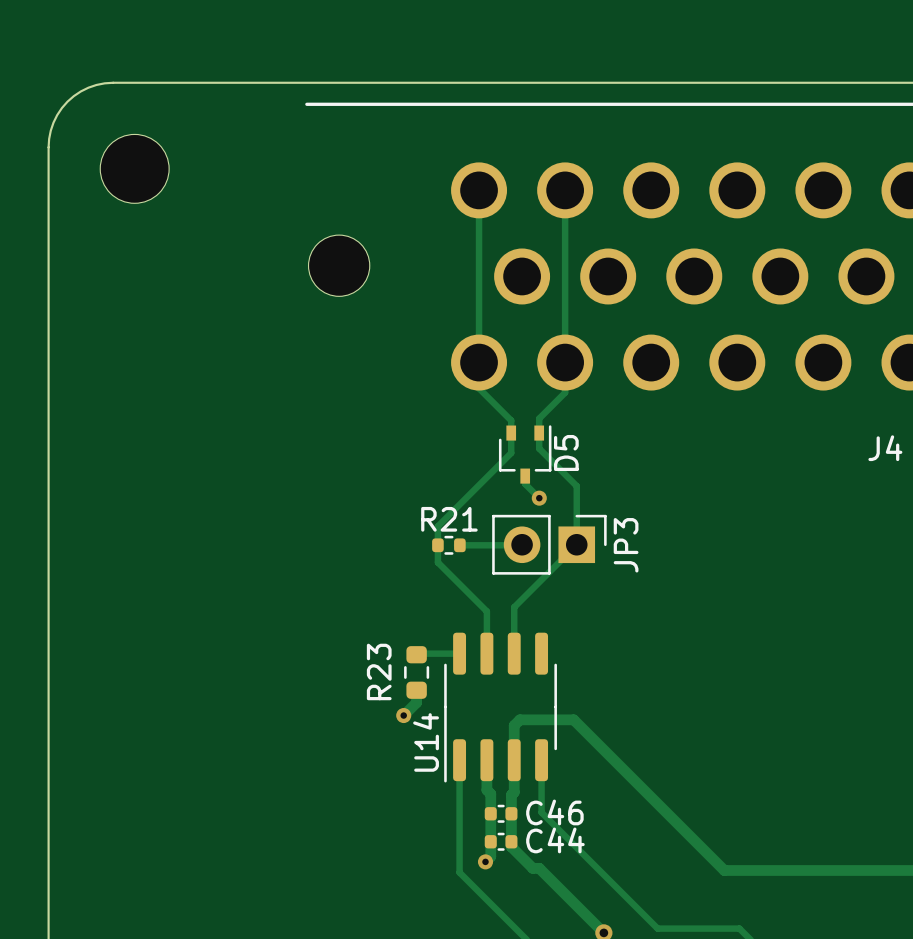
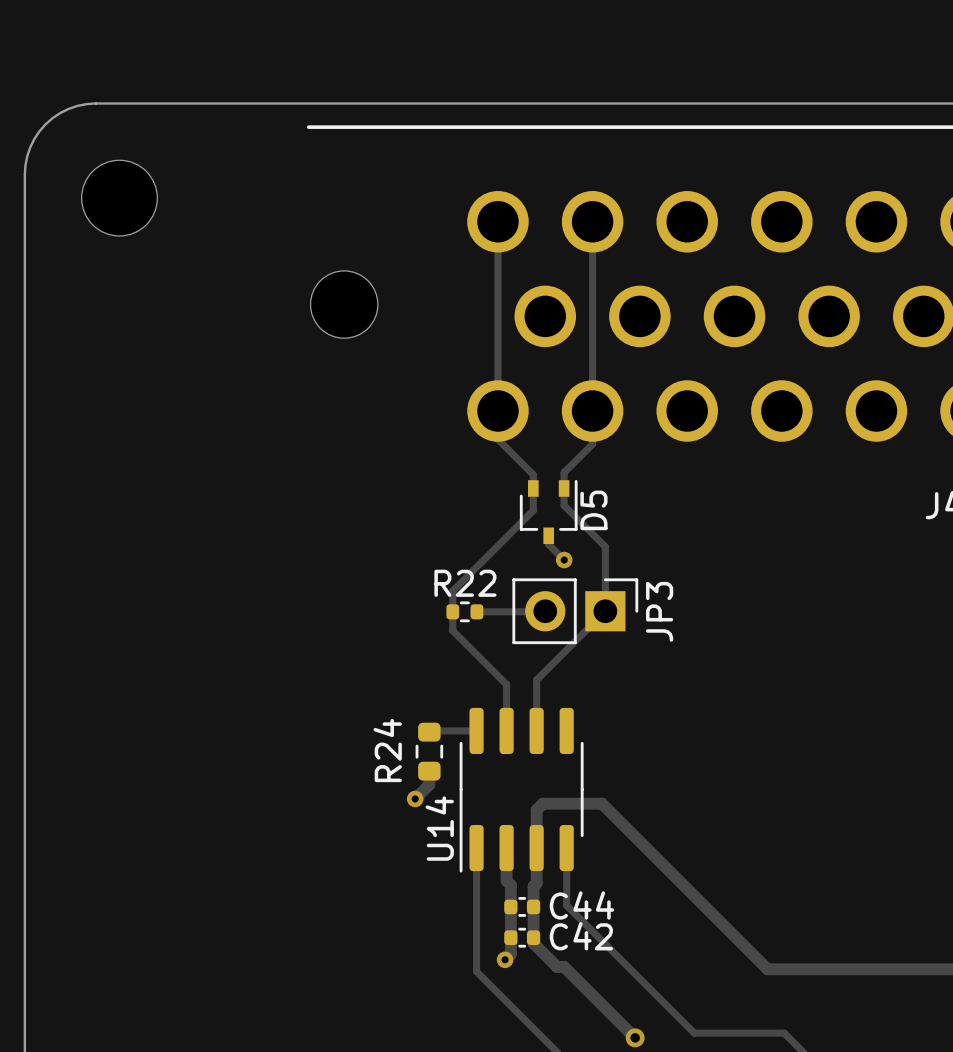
R21 name: R21 (449, 519) -> R22 (465, 583)
R23 name: R23 (379, 671) -> R24 (387, 750)
C46 name: C46 (554, 812) -> C44 (581, 905)
C44 name: C44 (555, 840) -> C42 (581, 936)

